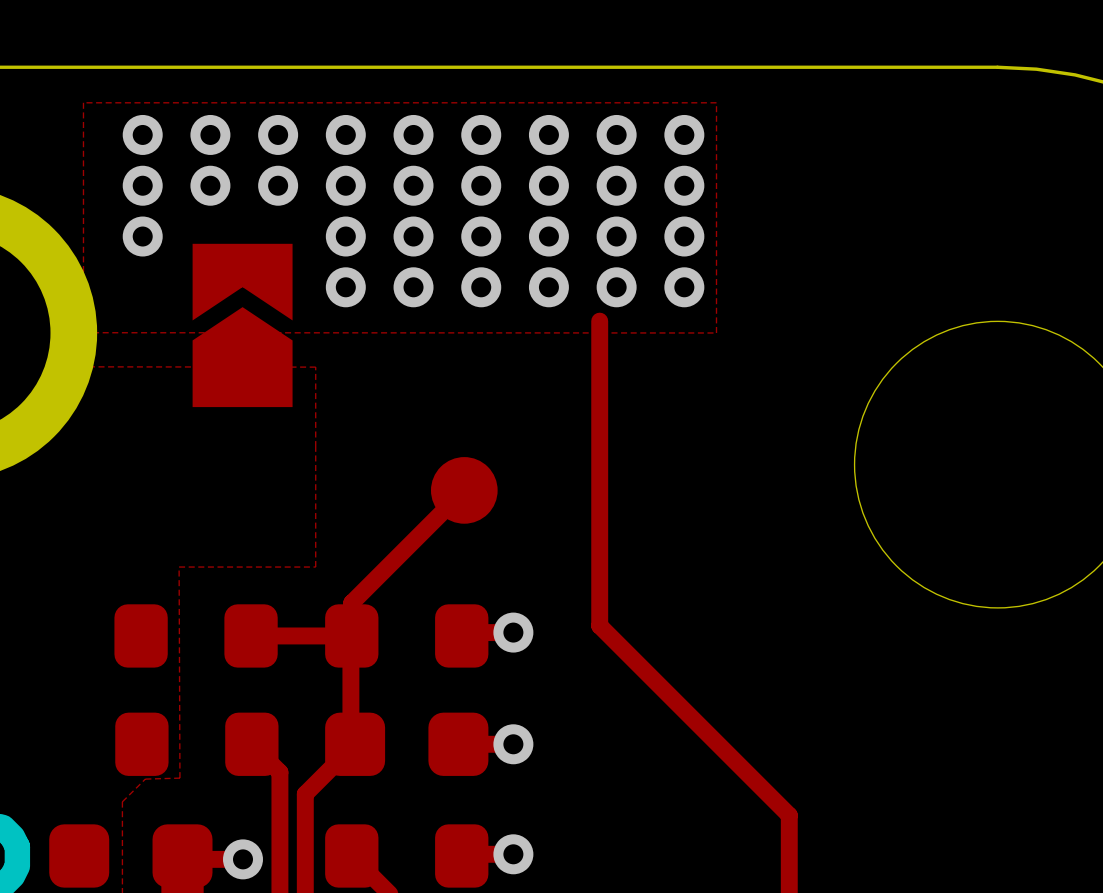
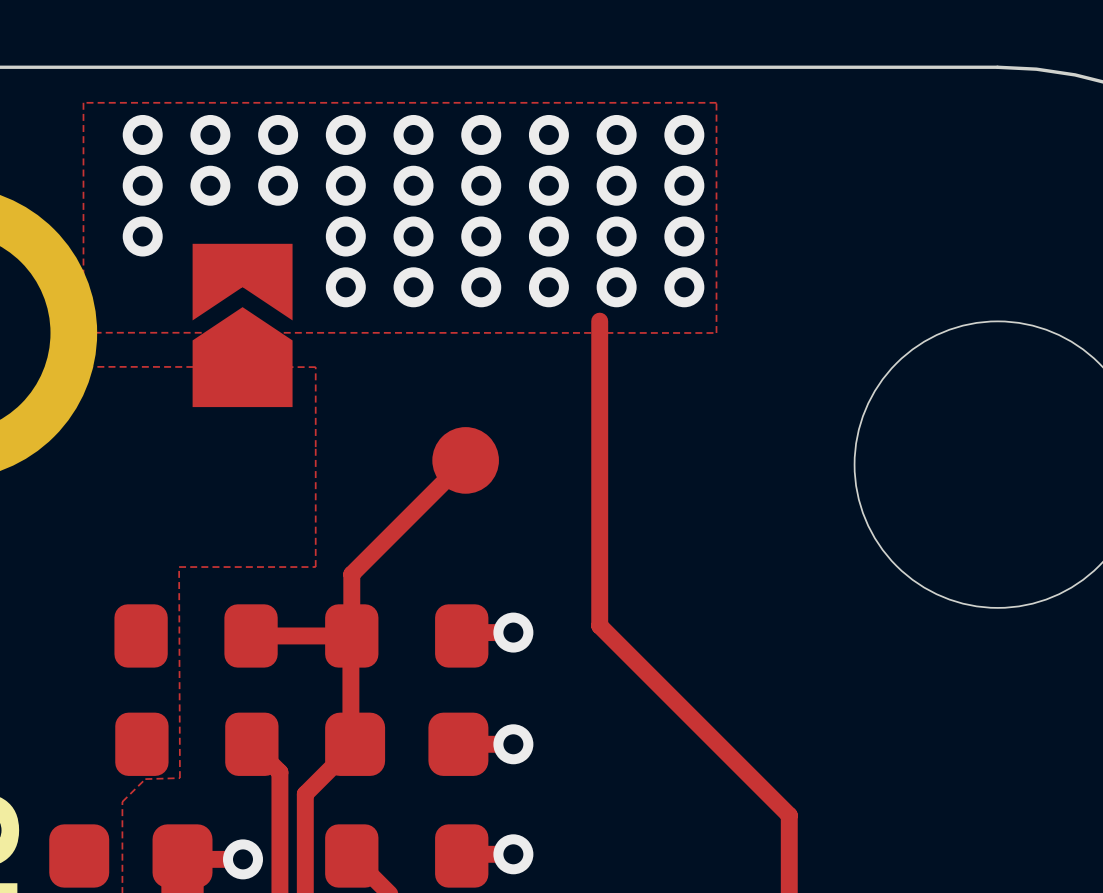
top track: (464, 490) (351, 602) -> (465, 460) (351, 574) (351, 602)
part position: (464, 490) -> (465, 460)

